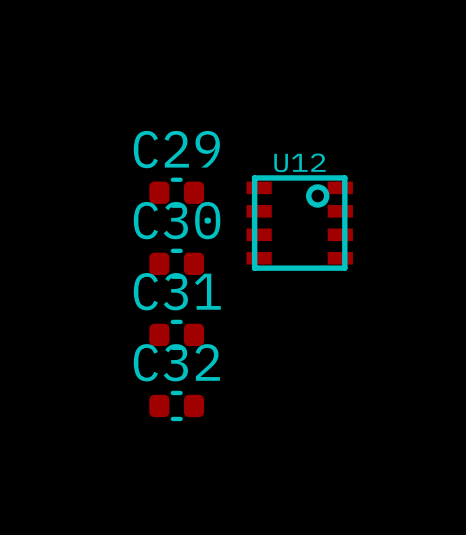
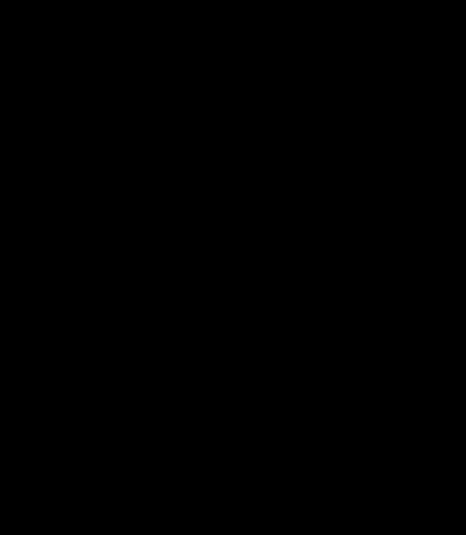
C29: (176, 192) -> none
U12: (299, 223) -> none
C30: (176, 263) -> none
C31: (176, 334) -> none
C32: (176, 405) -> none

